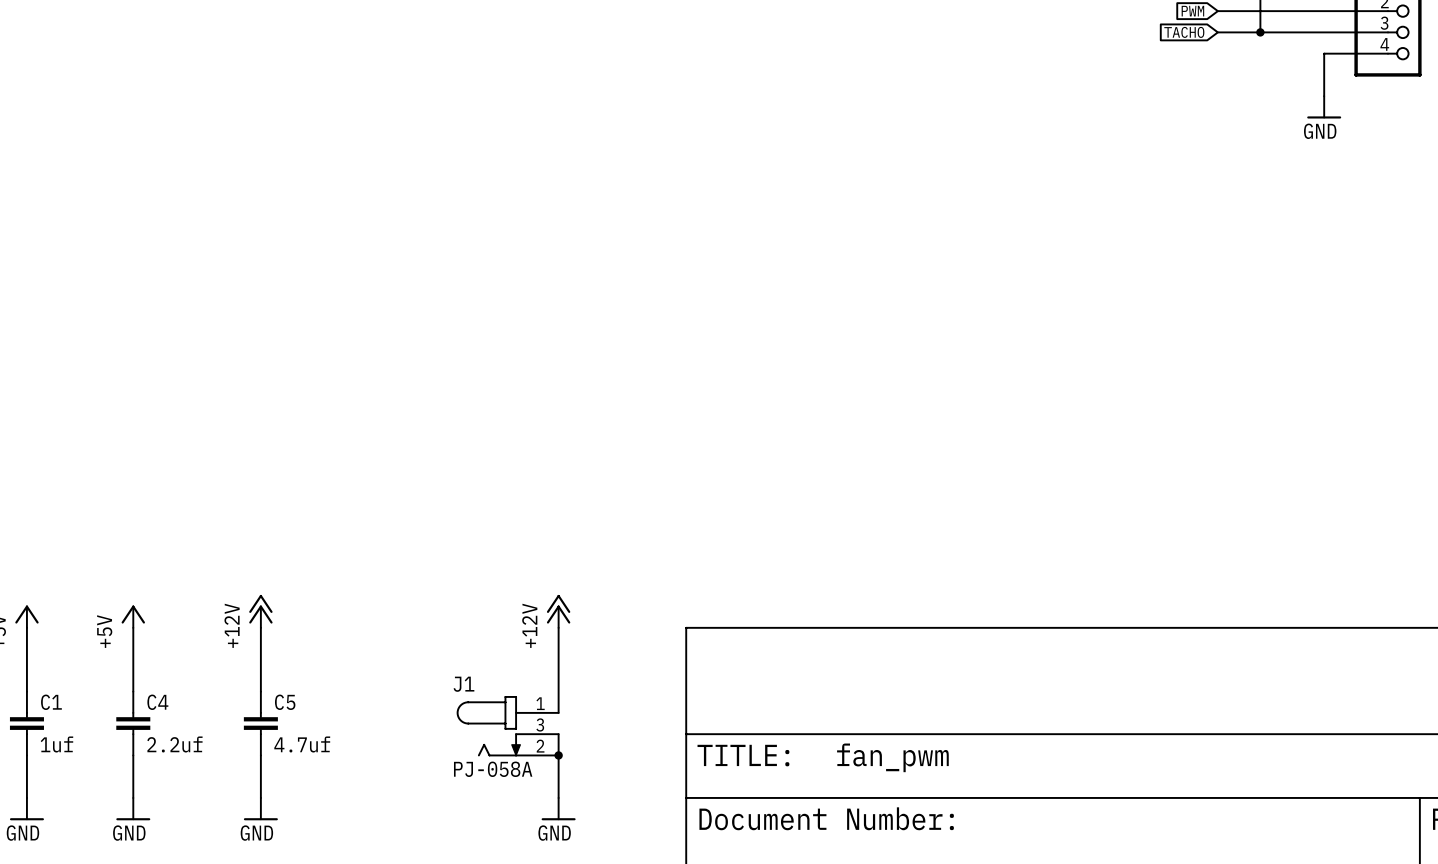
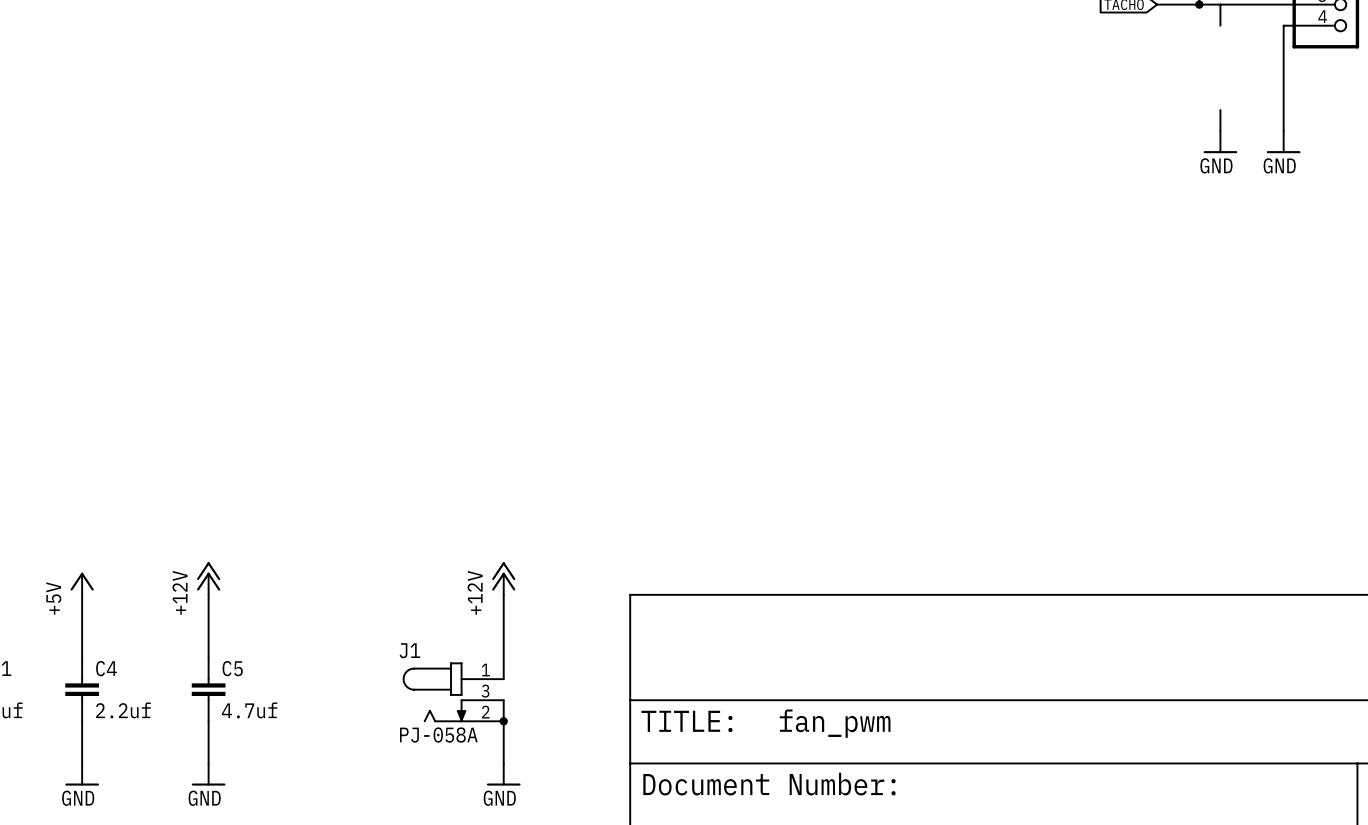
wire: none -> (1220, 4) (1220, 25)
wire: (1345, 53) (1324, 53) (1324, 96) -> (1283, 25) (1283, 131)
power symbol: GND (1324, 107) -> none
wire: none -> (1220, 110) (1220, 131)
power symbol: none -> GND (1220, 142)
power symbol: none -> GND (1283, 142)

